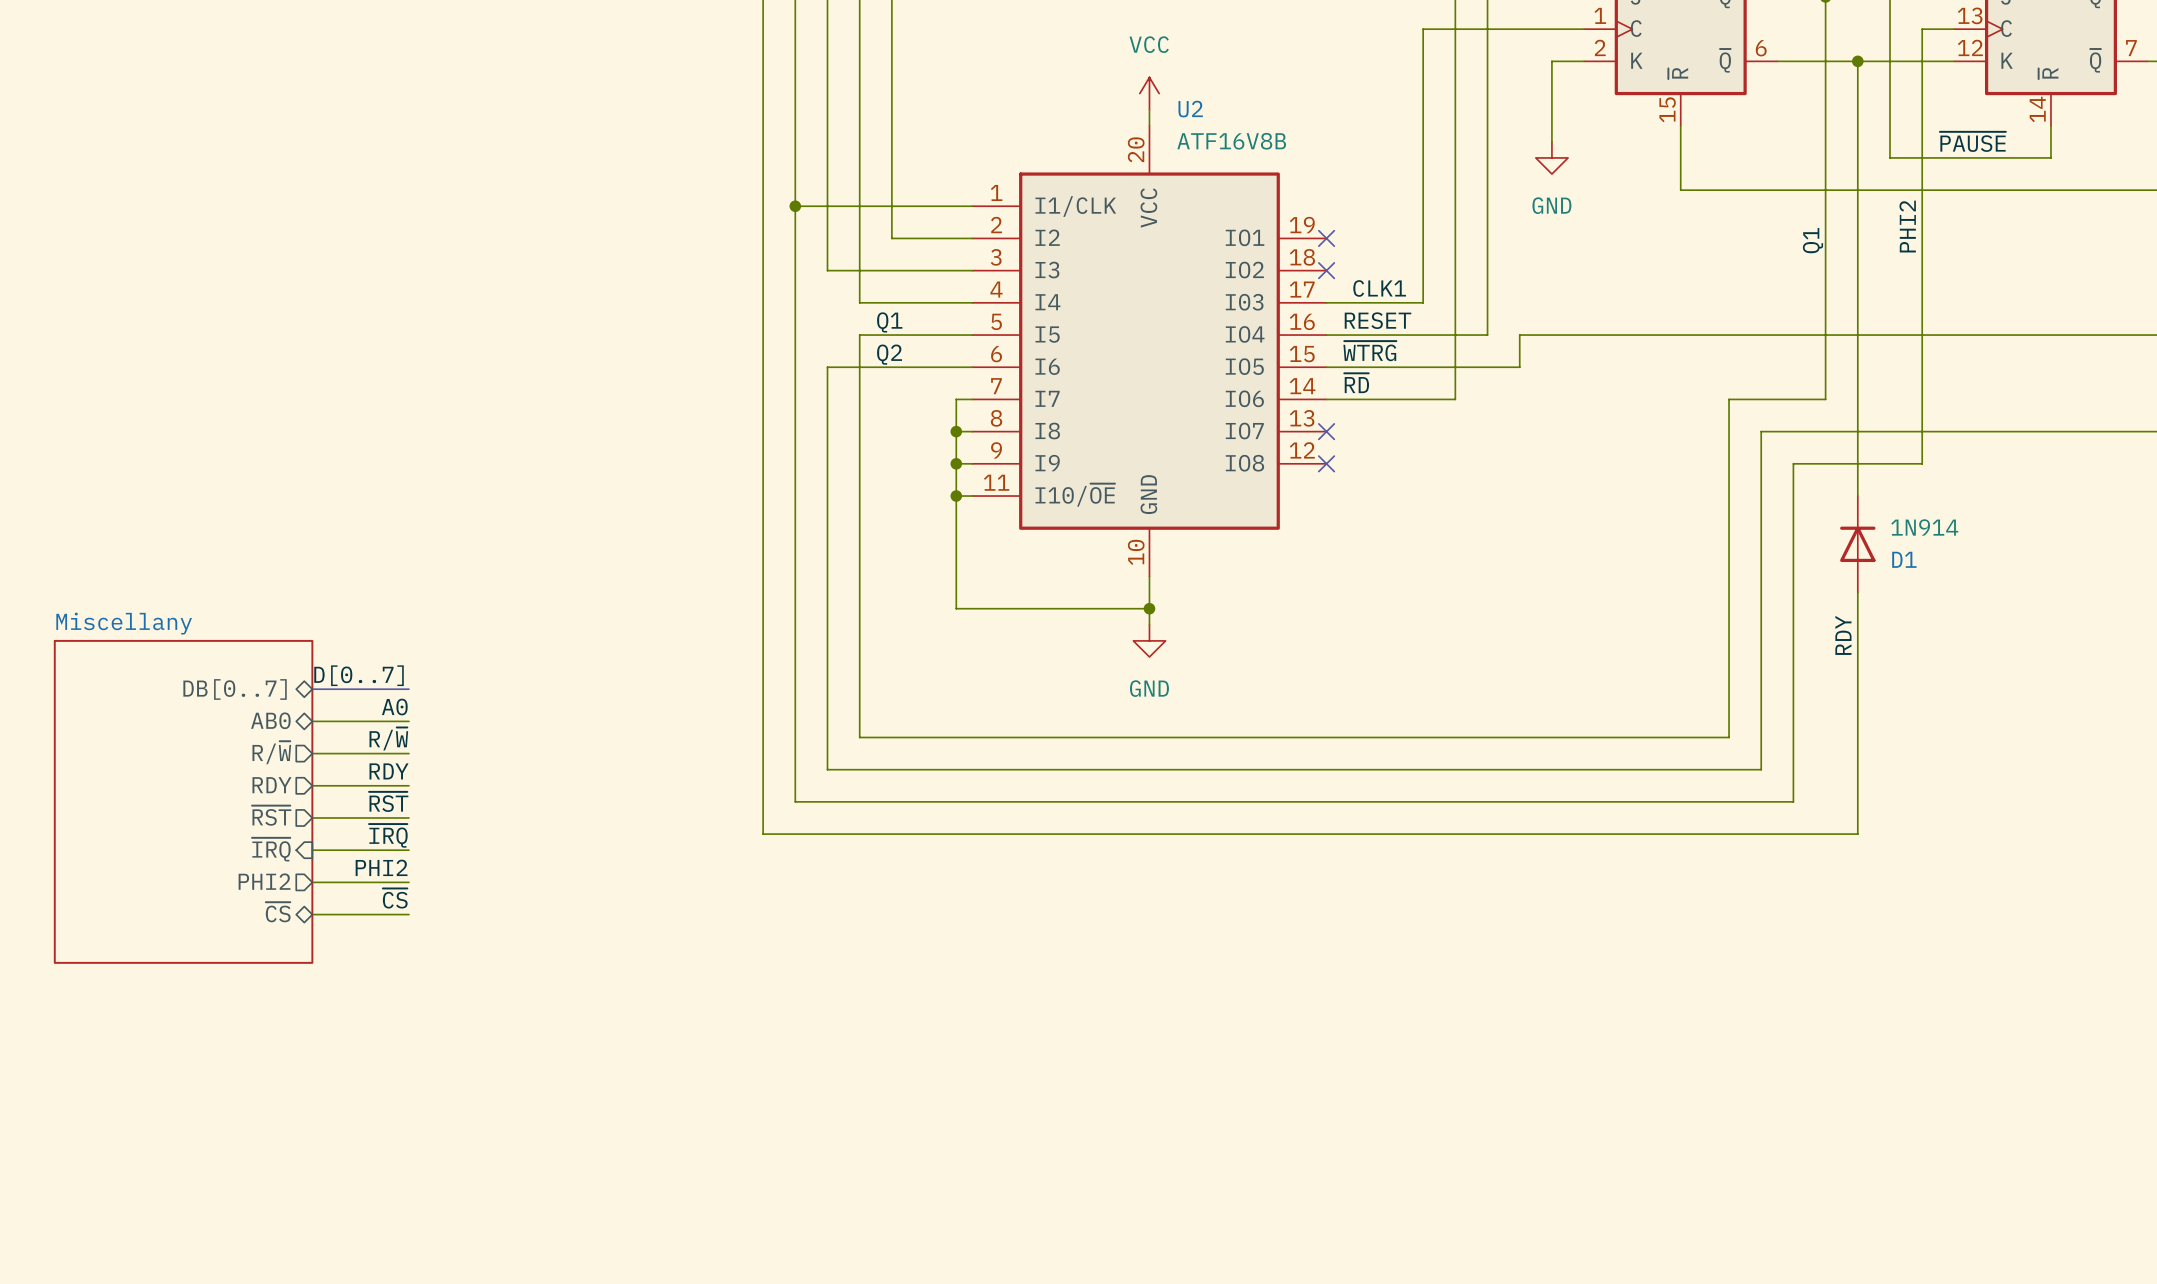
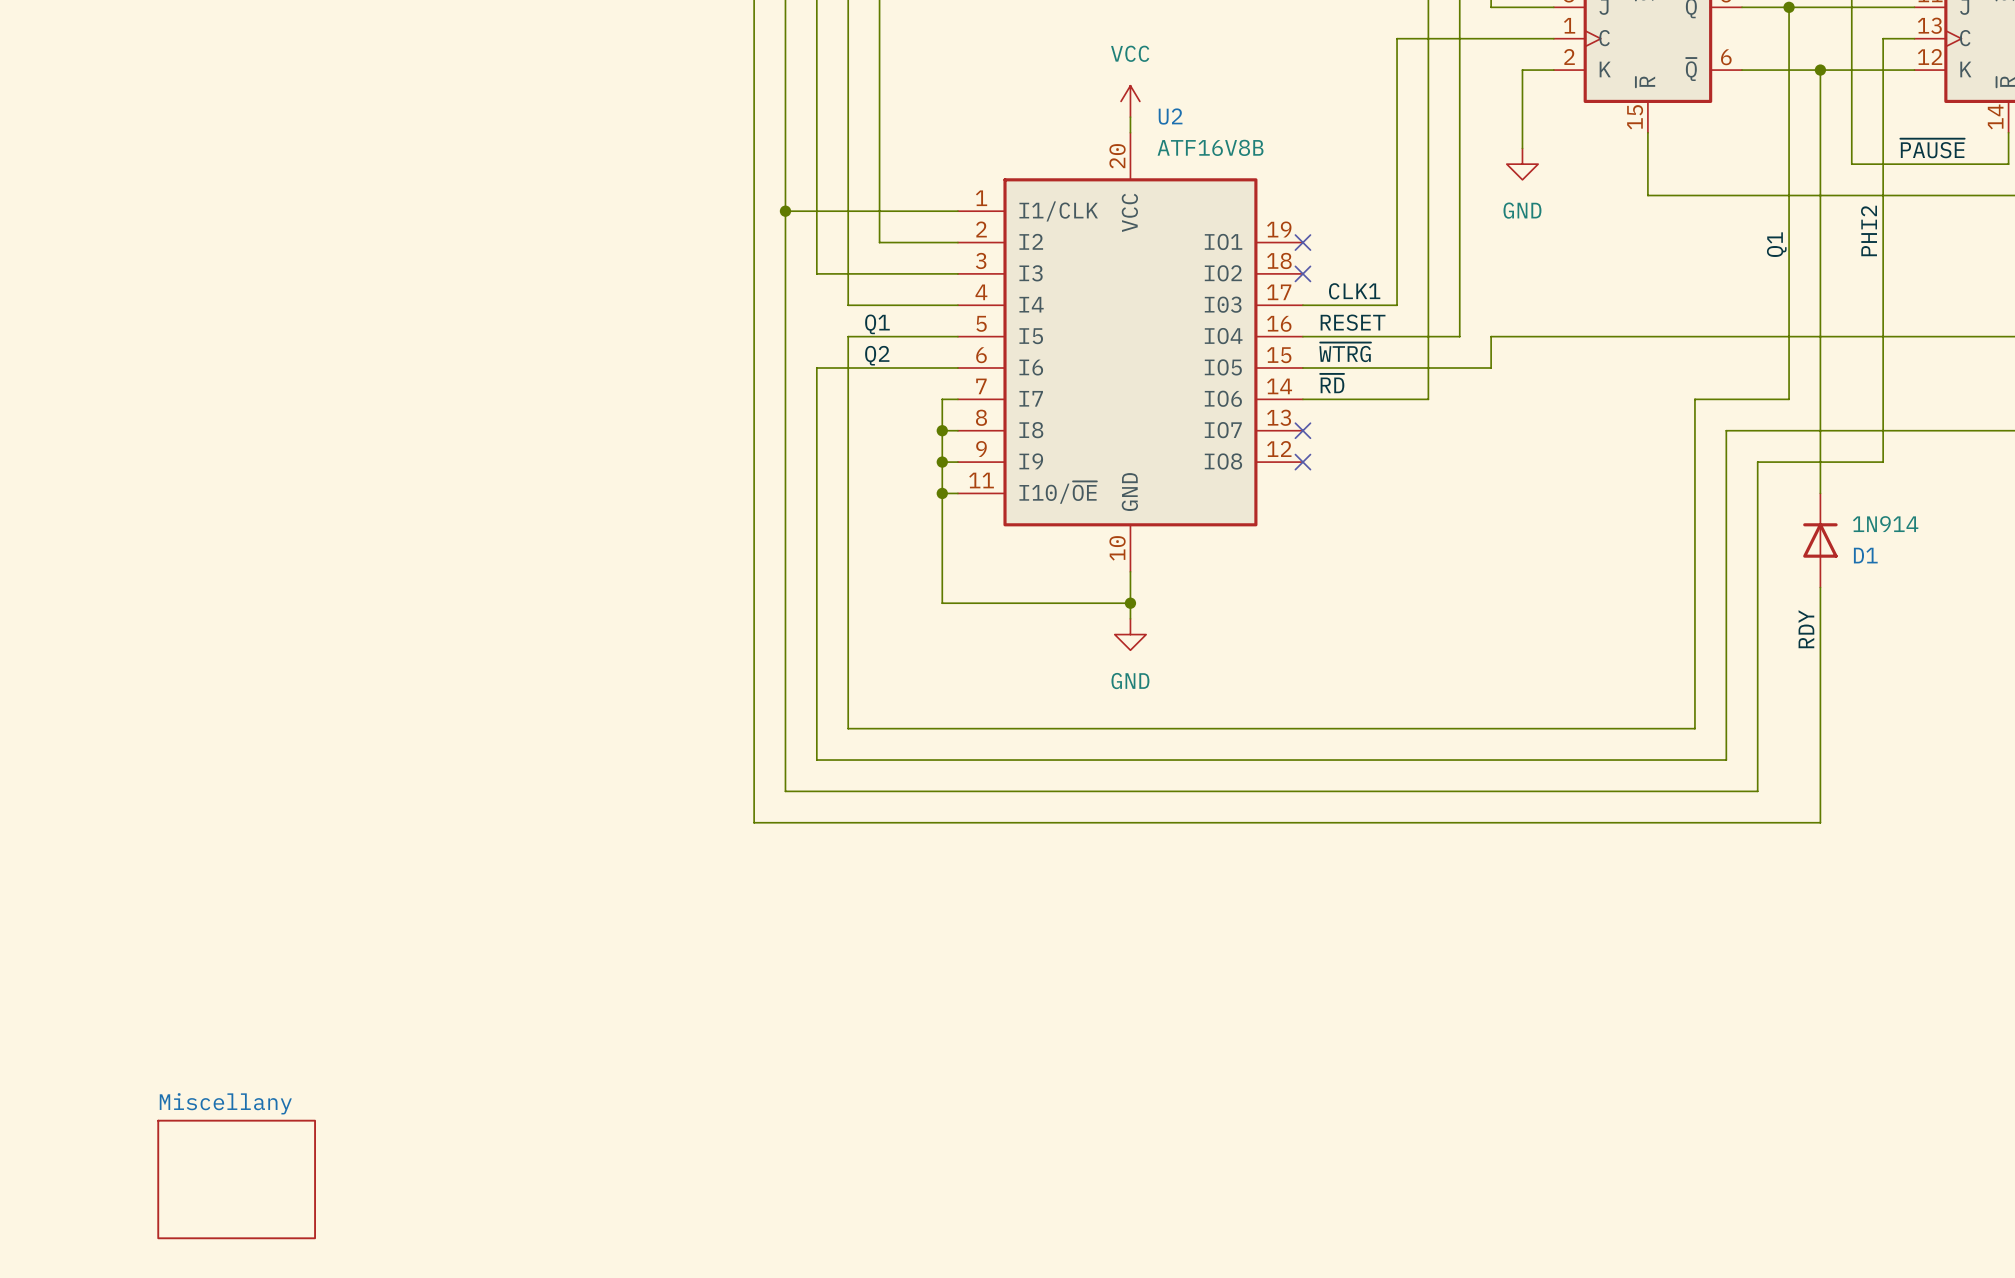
label: D[0..7] (359, 675) -> none
sheet pin: DB[0..7] (235, 689) -> none
bus: (312, 689) (408, 689) -> none
label: A0 (394, 707) -> none
sheet pin: AB0 (270, 720) -> none
wire: (312, 721) (408, 721) -> none
label: R/~{W} (388, 738) -> none
sheet pin: R/~{W} (271, 752) -> none
wire: (312, 753) (408, 753) -> none
label: RDY (389, 771) -> none
sheet pin: RDY (271, 785) -> none
wire: (312, 785) (408, 785) -> none
sheet Miscellany: (183, 801) -> none
label: ~{RST} (388, 801) -> none
sheet pin: ~{RST} (271, 815) -> none
wire: (312, 817) (408, 817) -> none
label: ~{IRQ} (388, 835) -> none
sheet pin: ~{IRQ} (271, 849) -> none
wire: (312, 850) (408, 850) -> none
label: PHI2 (381, 867) -> none
sheet pin: PHI2 (264, 881) -> none
wire: (312, 882) (408, 882) -> none
label: ~{CS} (395, 898) -> none
sheet pin: ~{CS} (278, 912) -> none
wire: (312, 914) (408, 914) -> none
sheet Miscellany: none -> (236, 1179)

